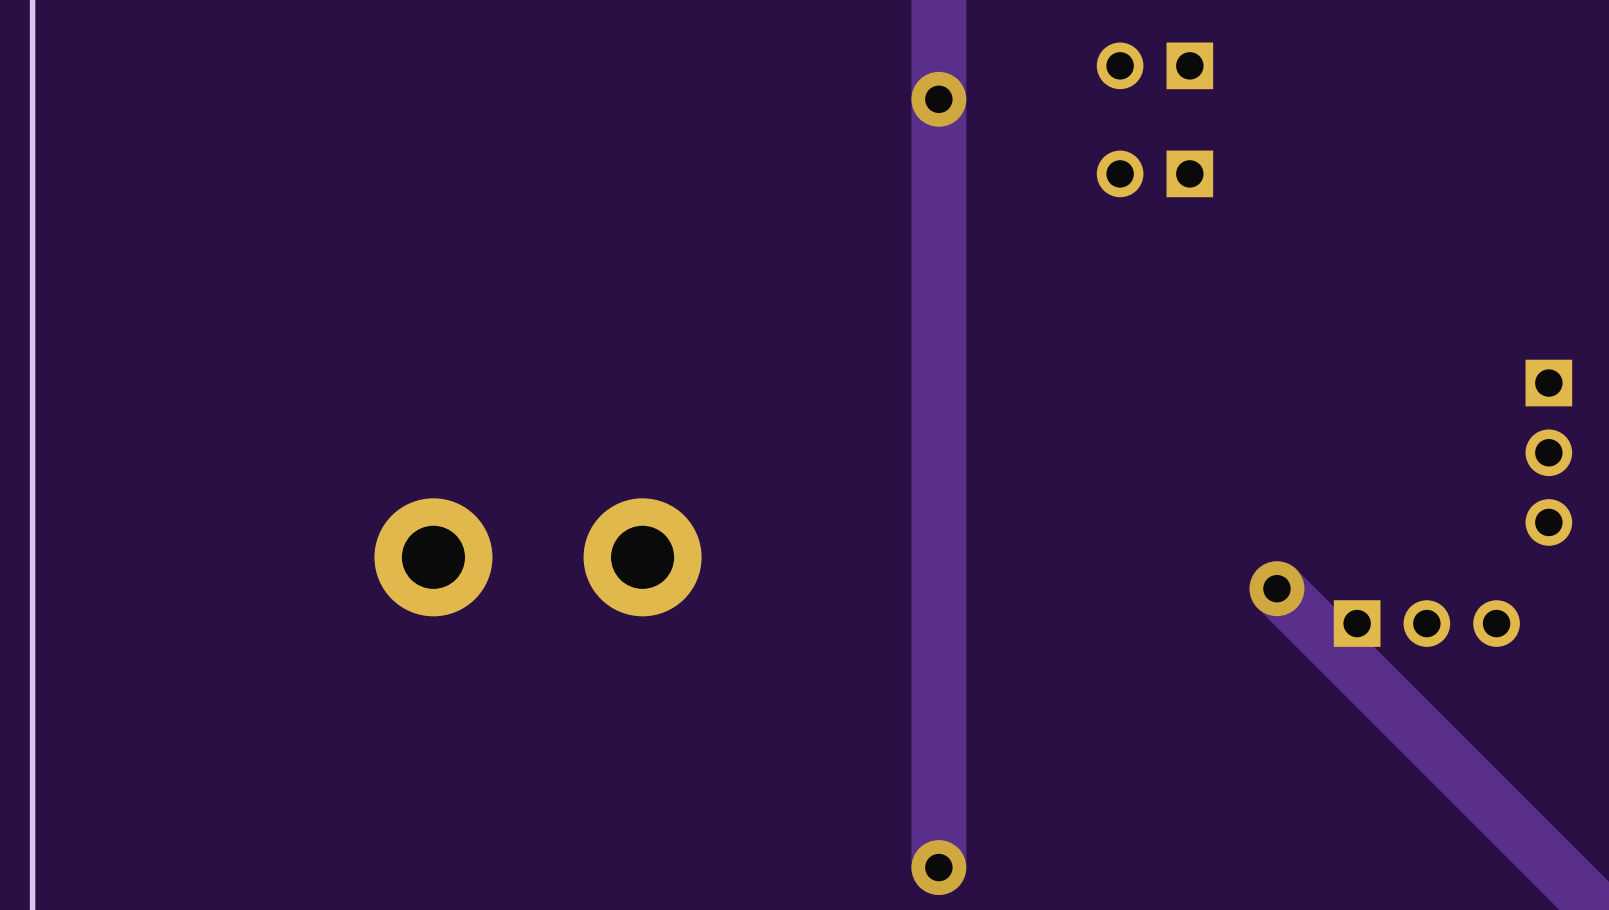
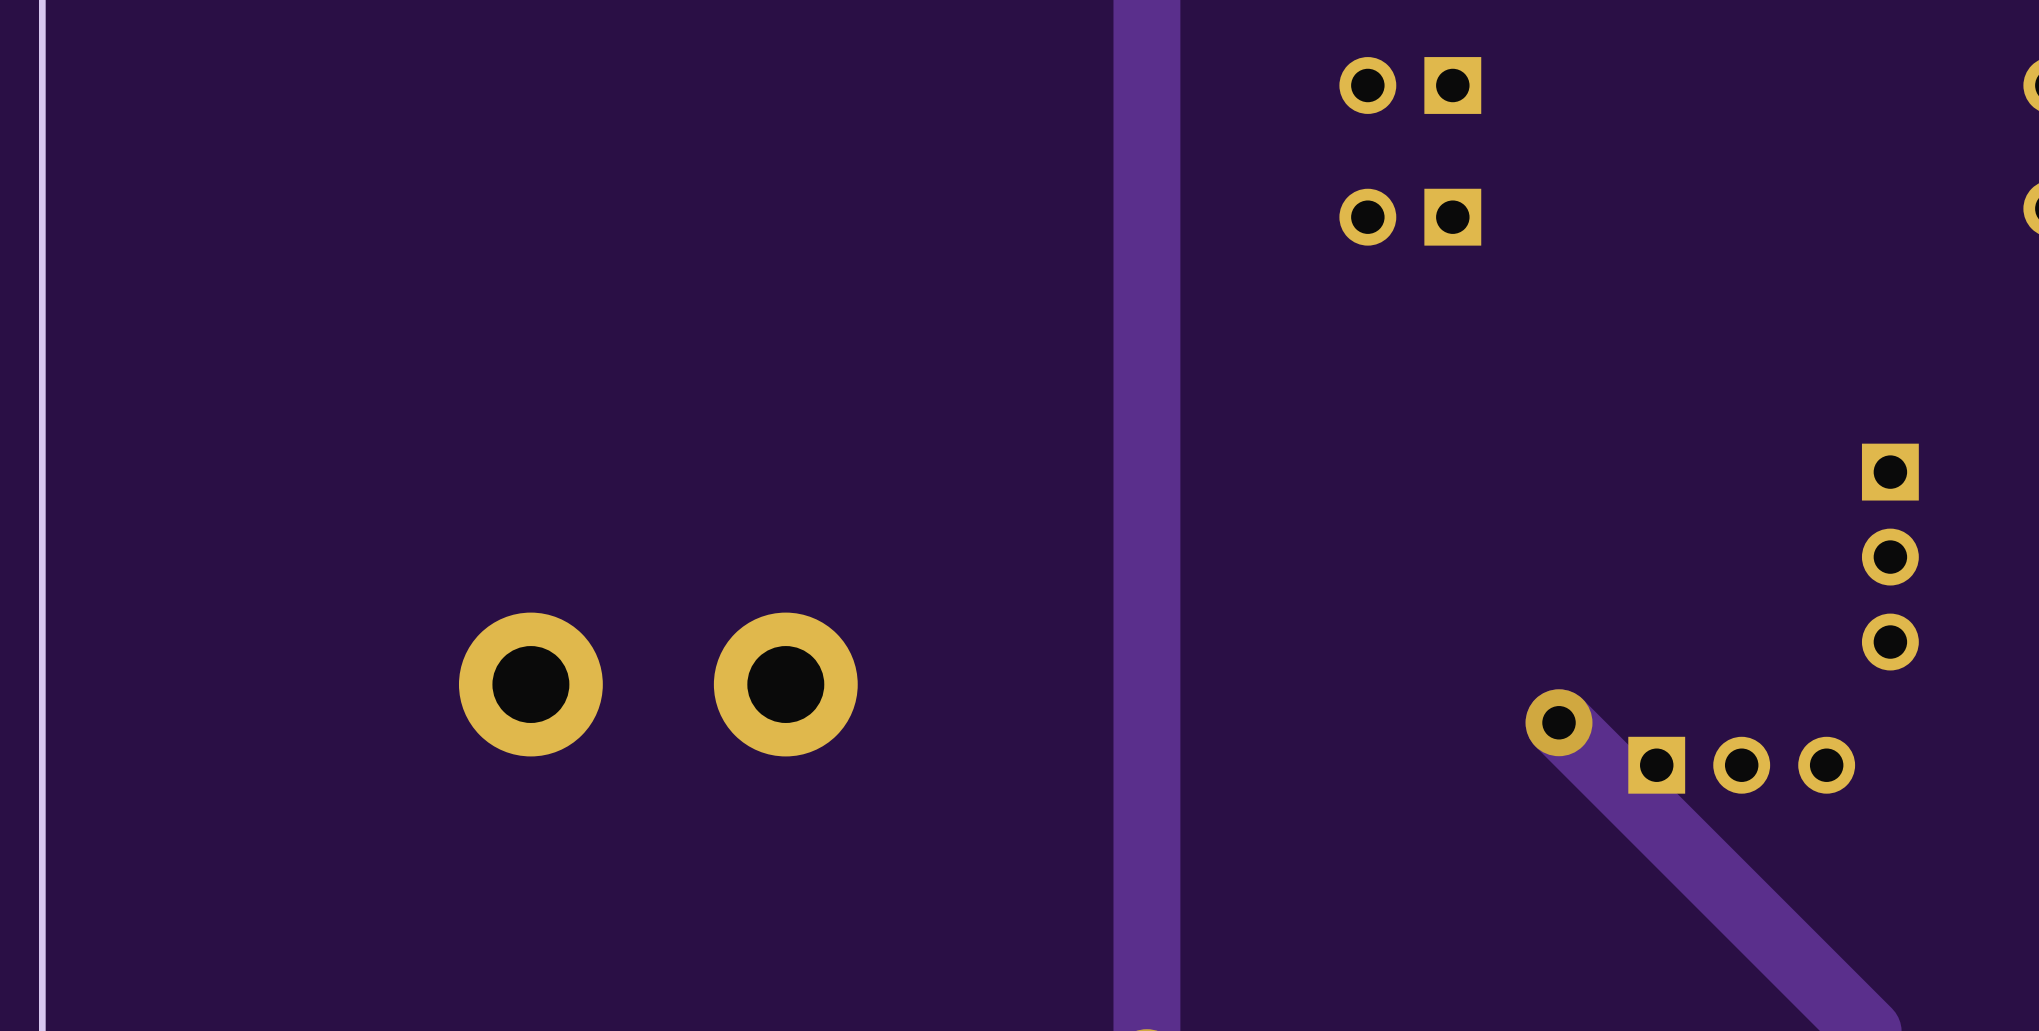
via: (938, 99) -> none

